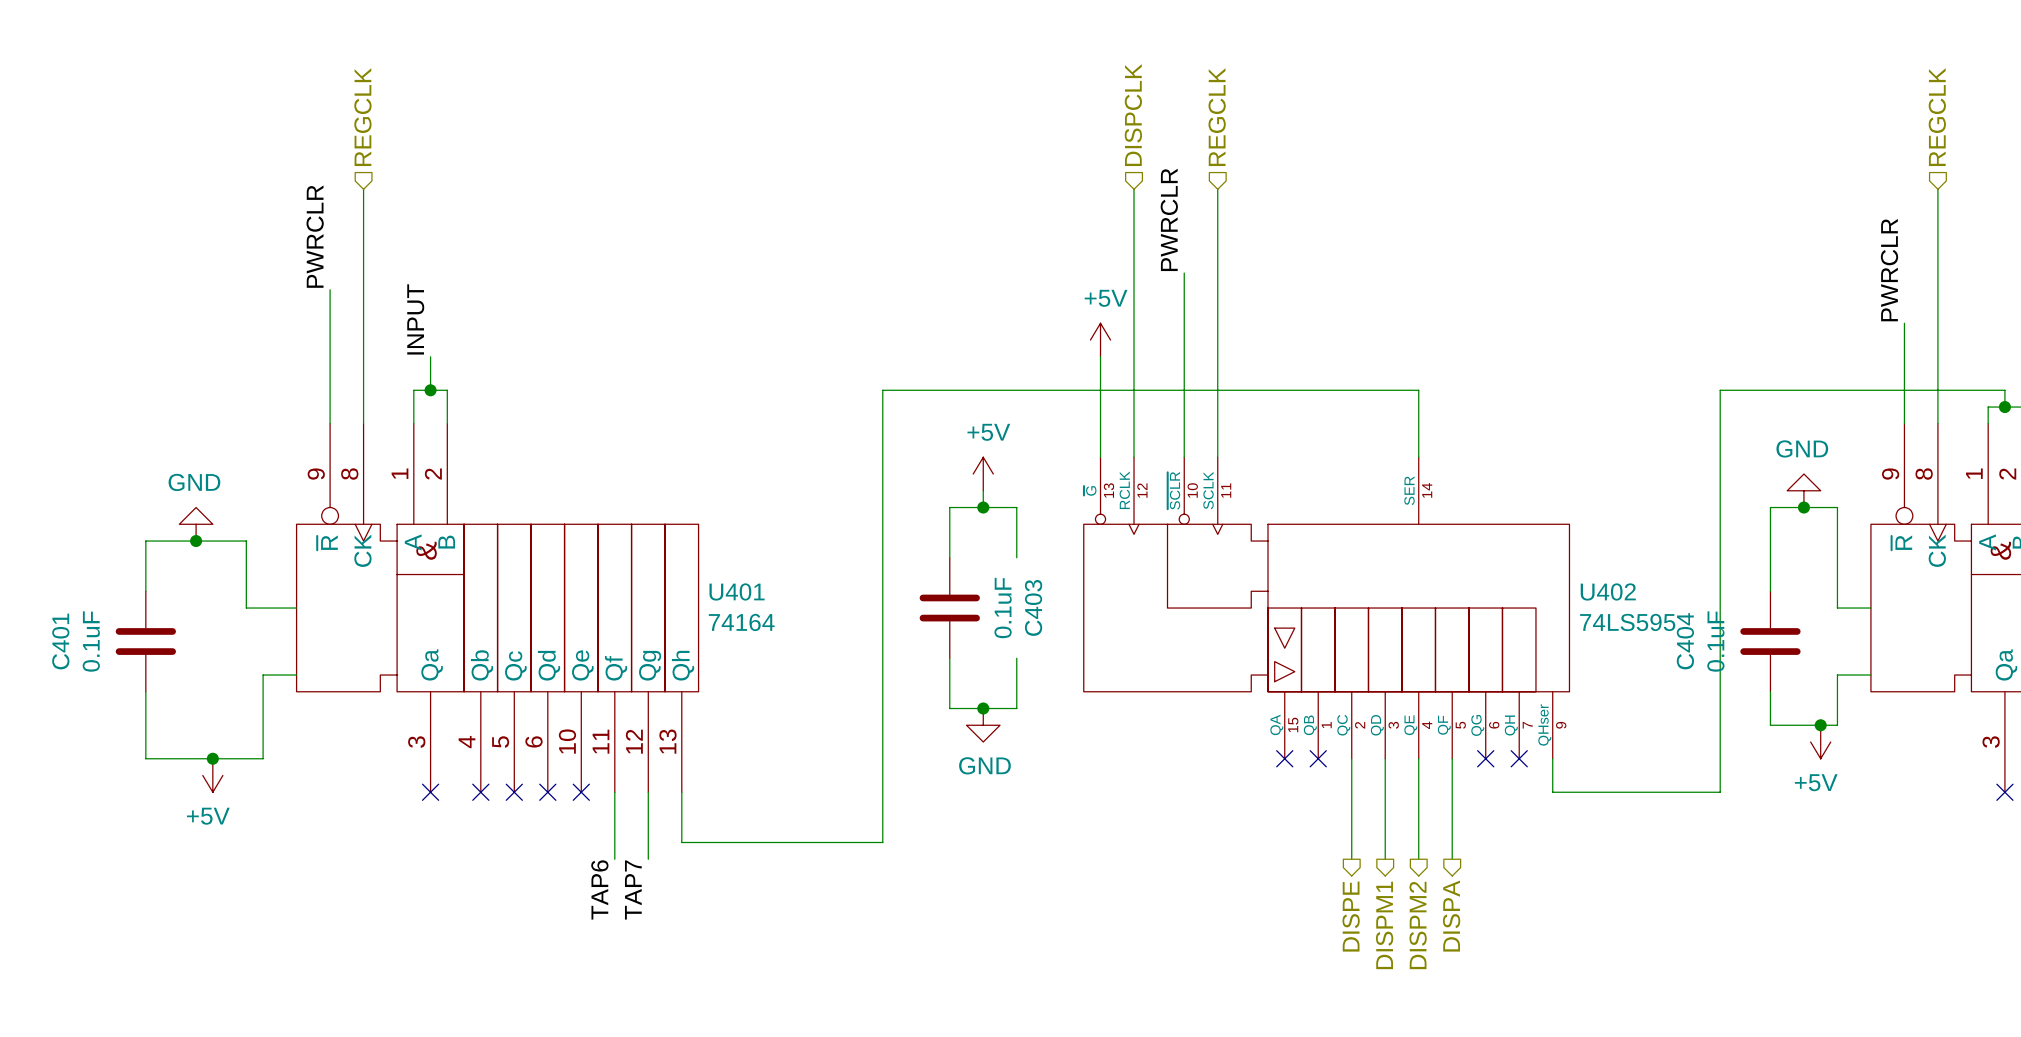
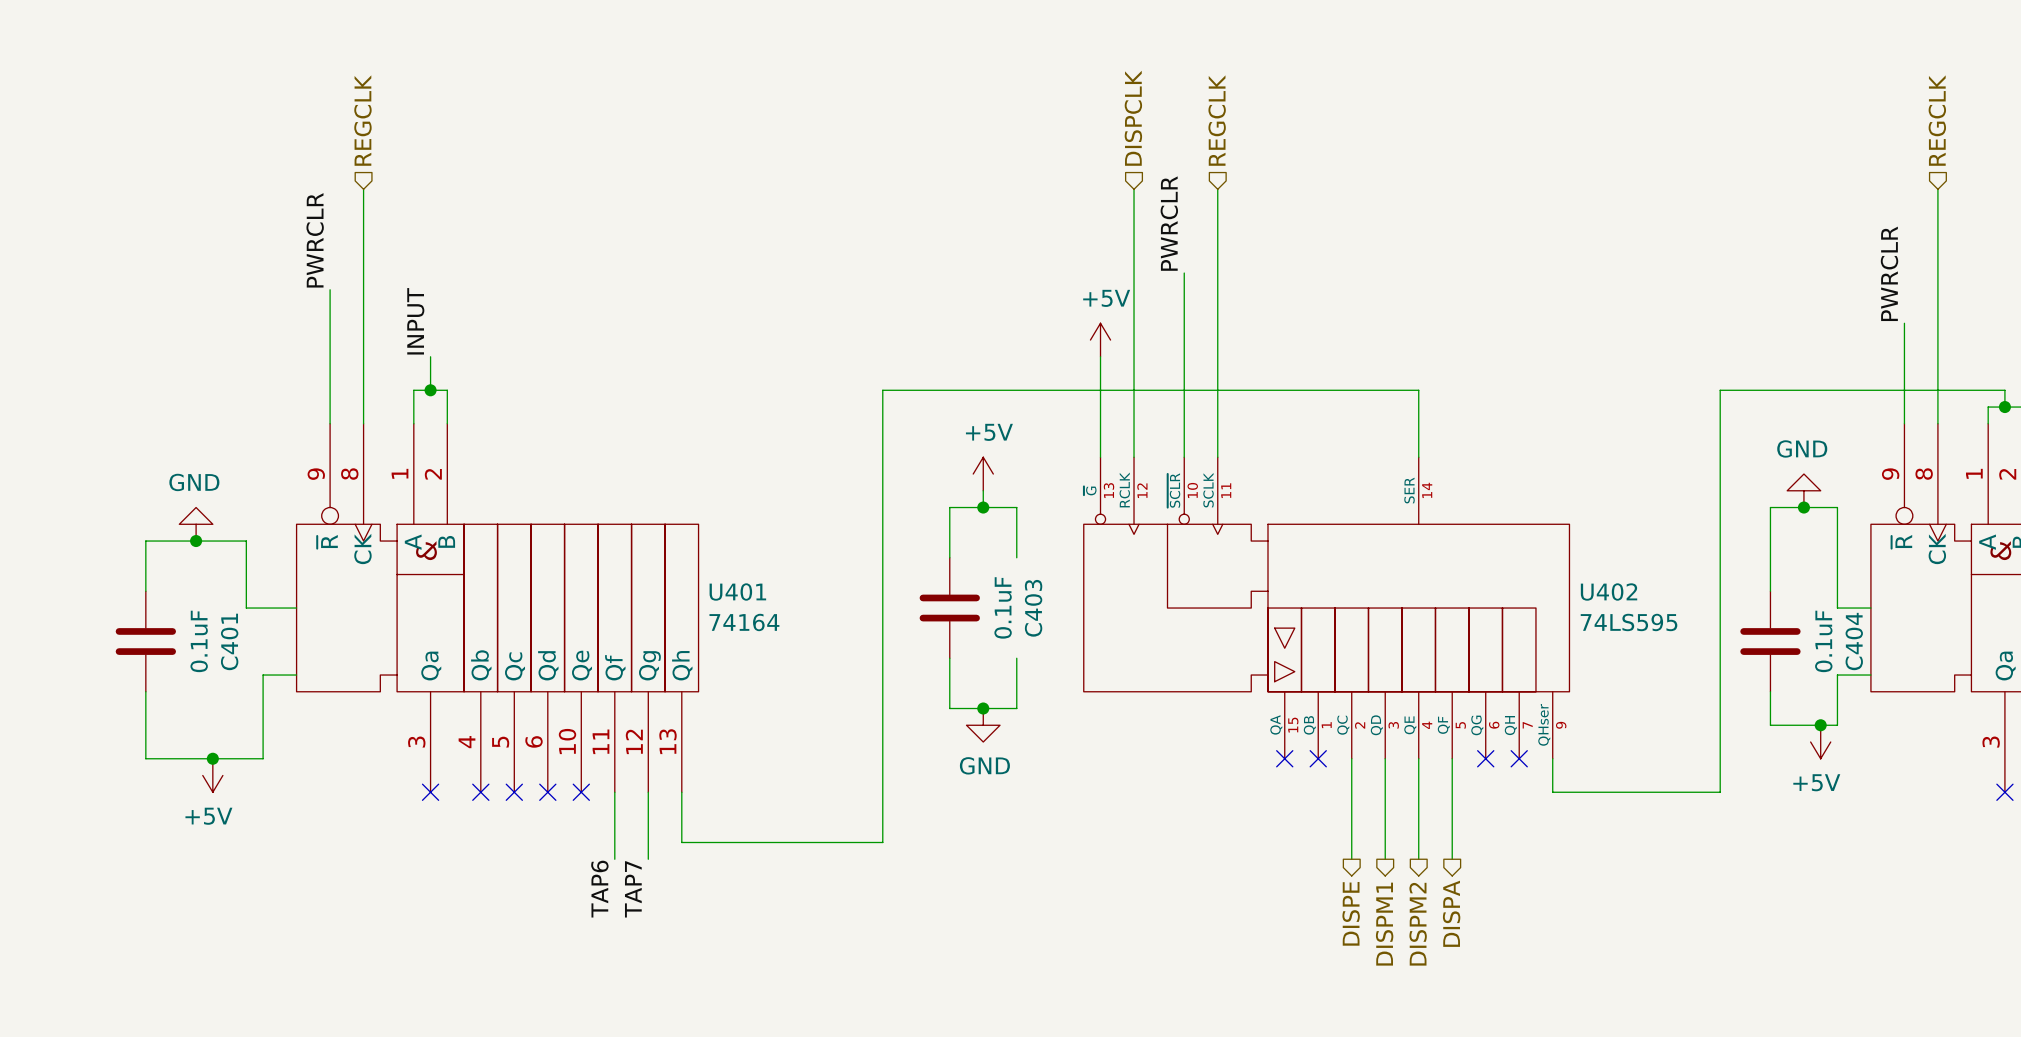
C401 name position: C401 (60, 641) -> C401 (229, 641)
C401 value position: 0.1uF (91, 641) -> 0.1uF (199, 641)
C404 name position: C404 (1685, 641) -> C404 (1854, 641)
C404 value position: 0.1uF (1715, 641) -> 0.1uF (1823, 641)

